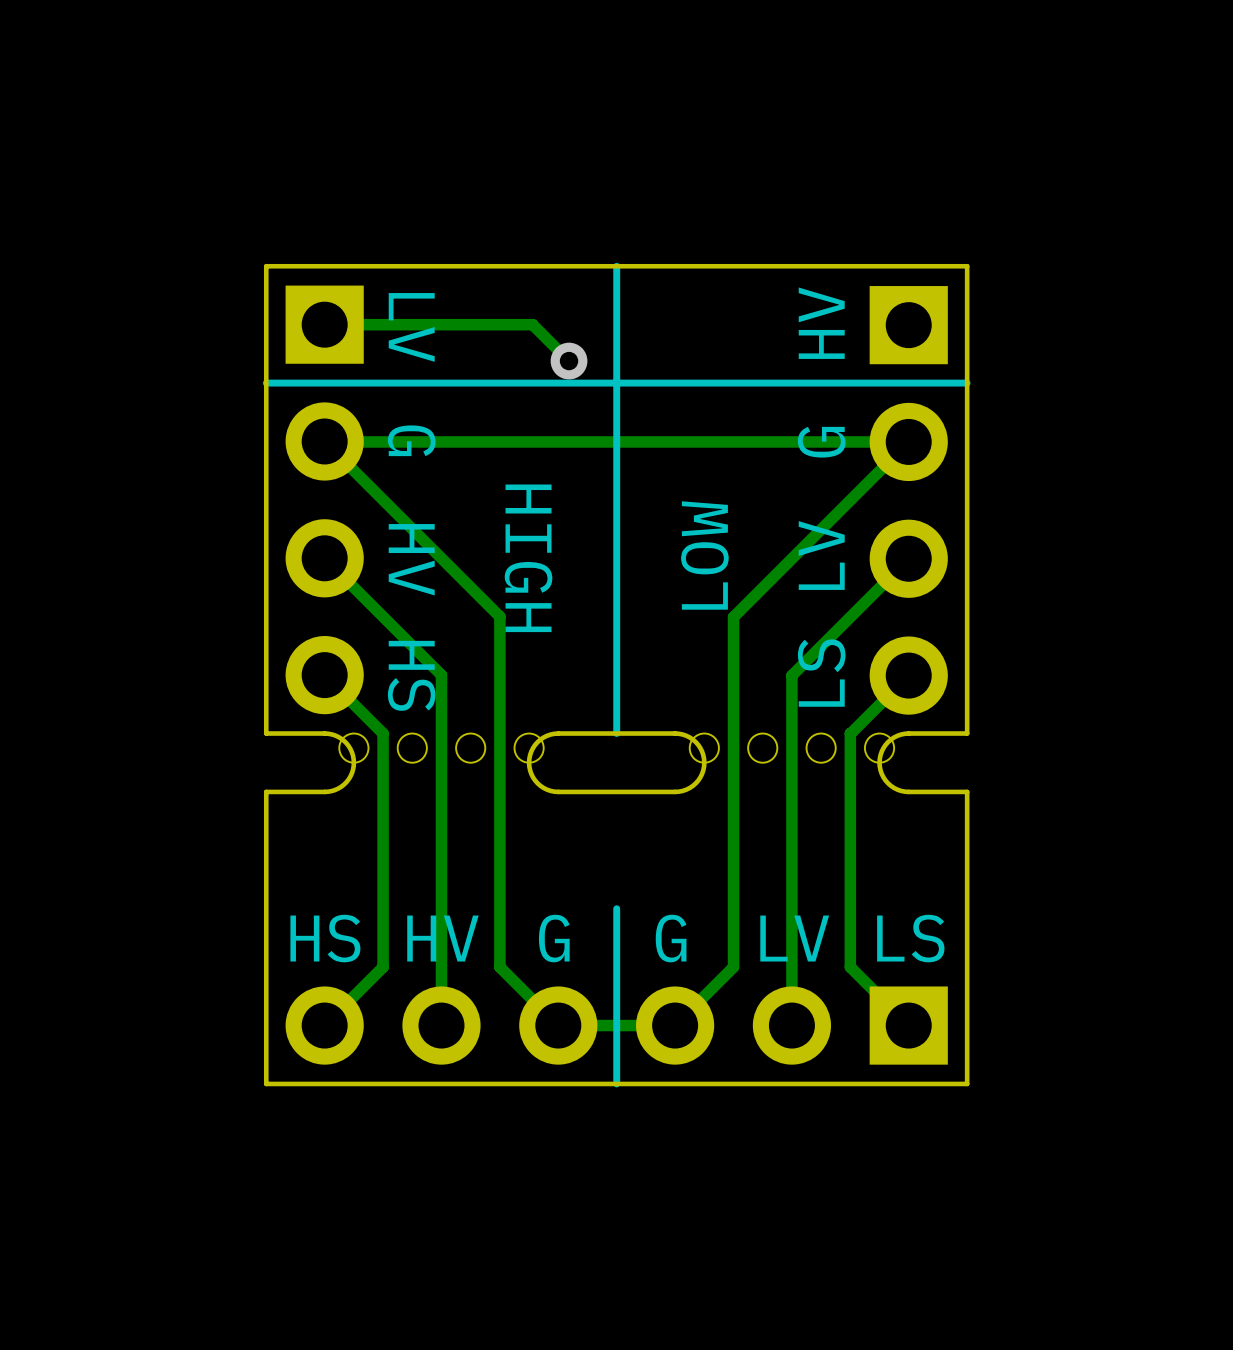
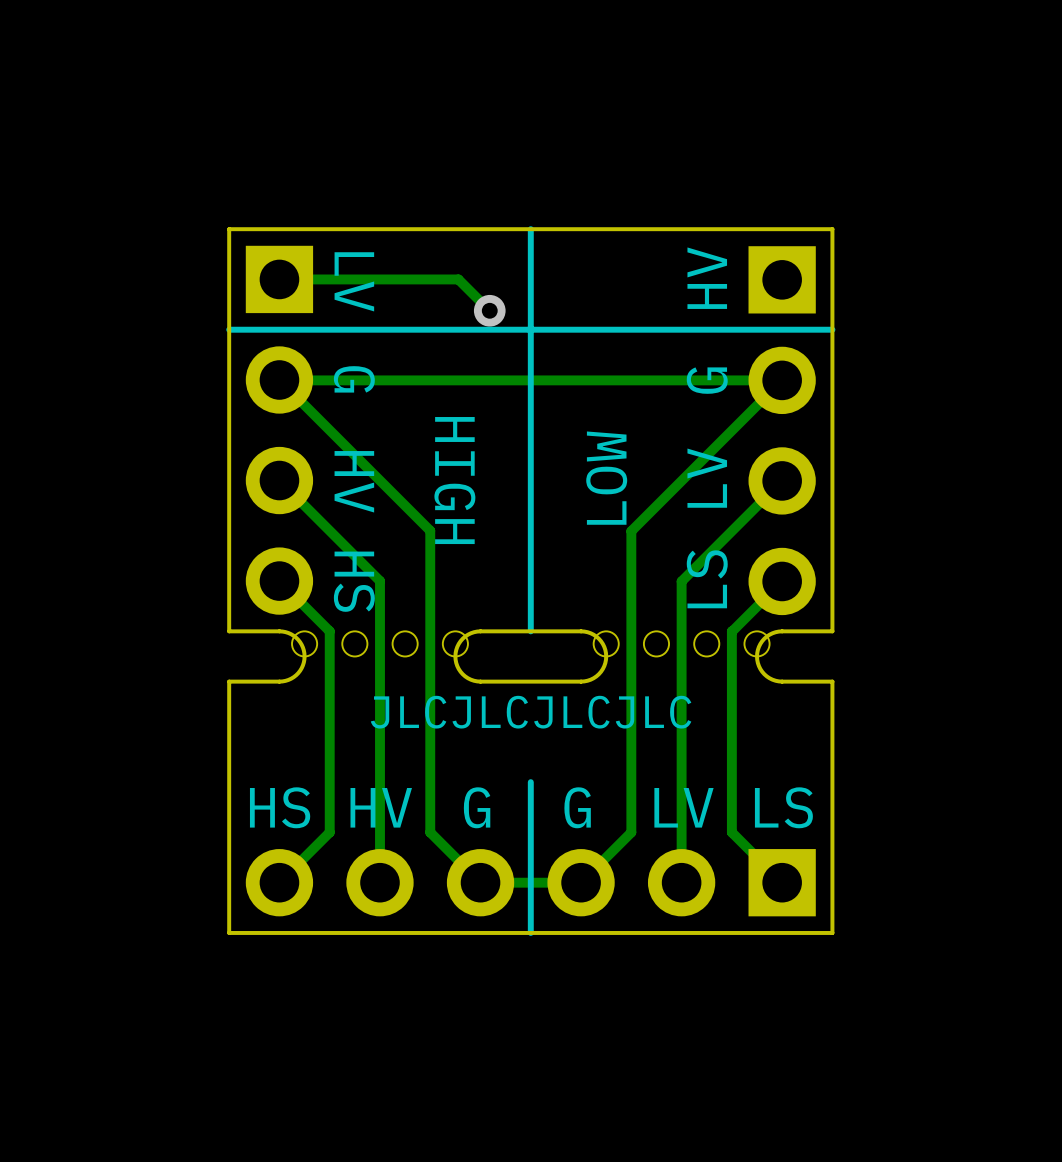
text: none -> JLCJLCJLCJLC (531, 712)

